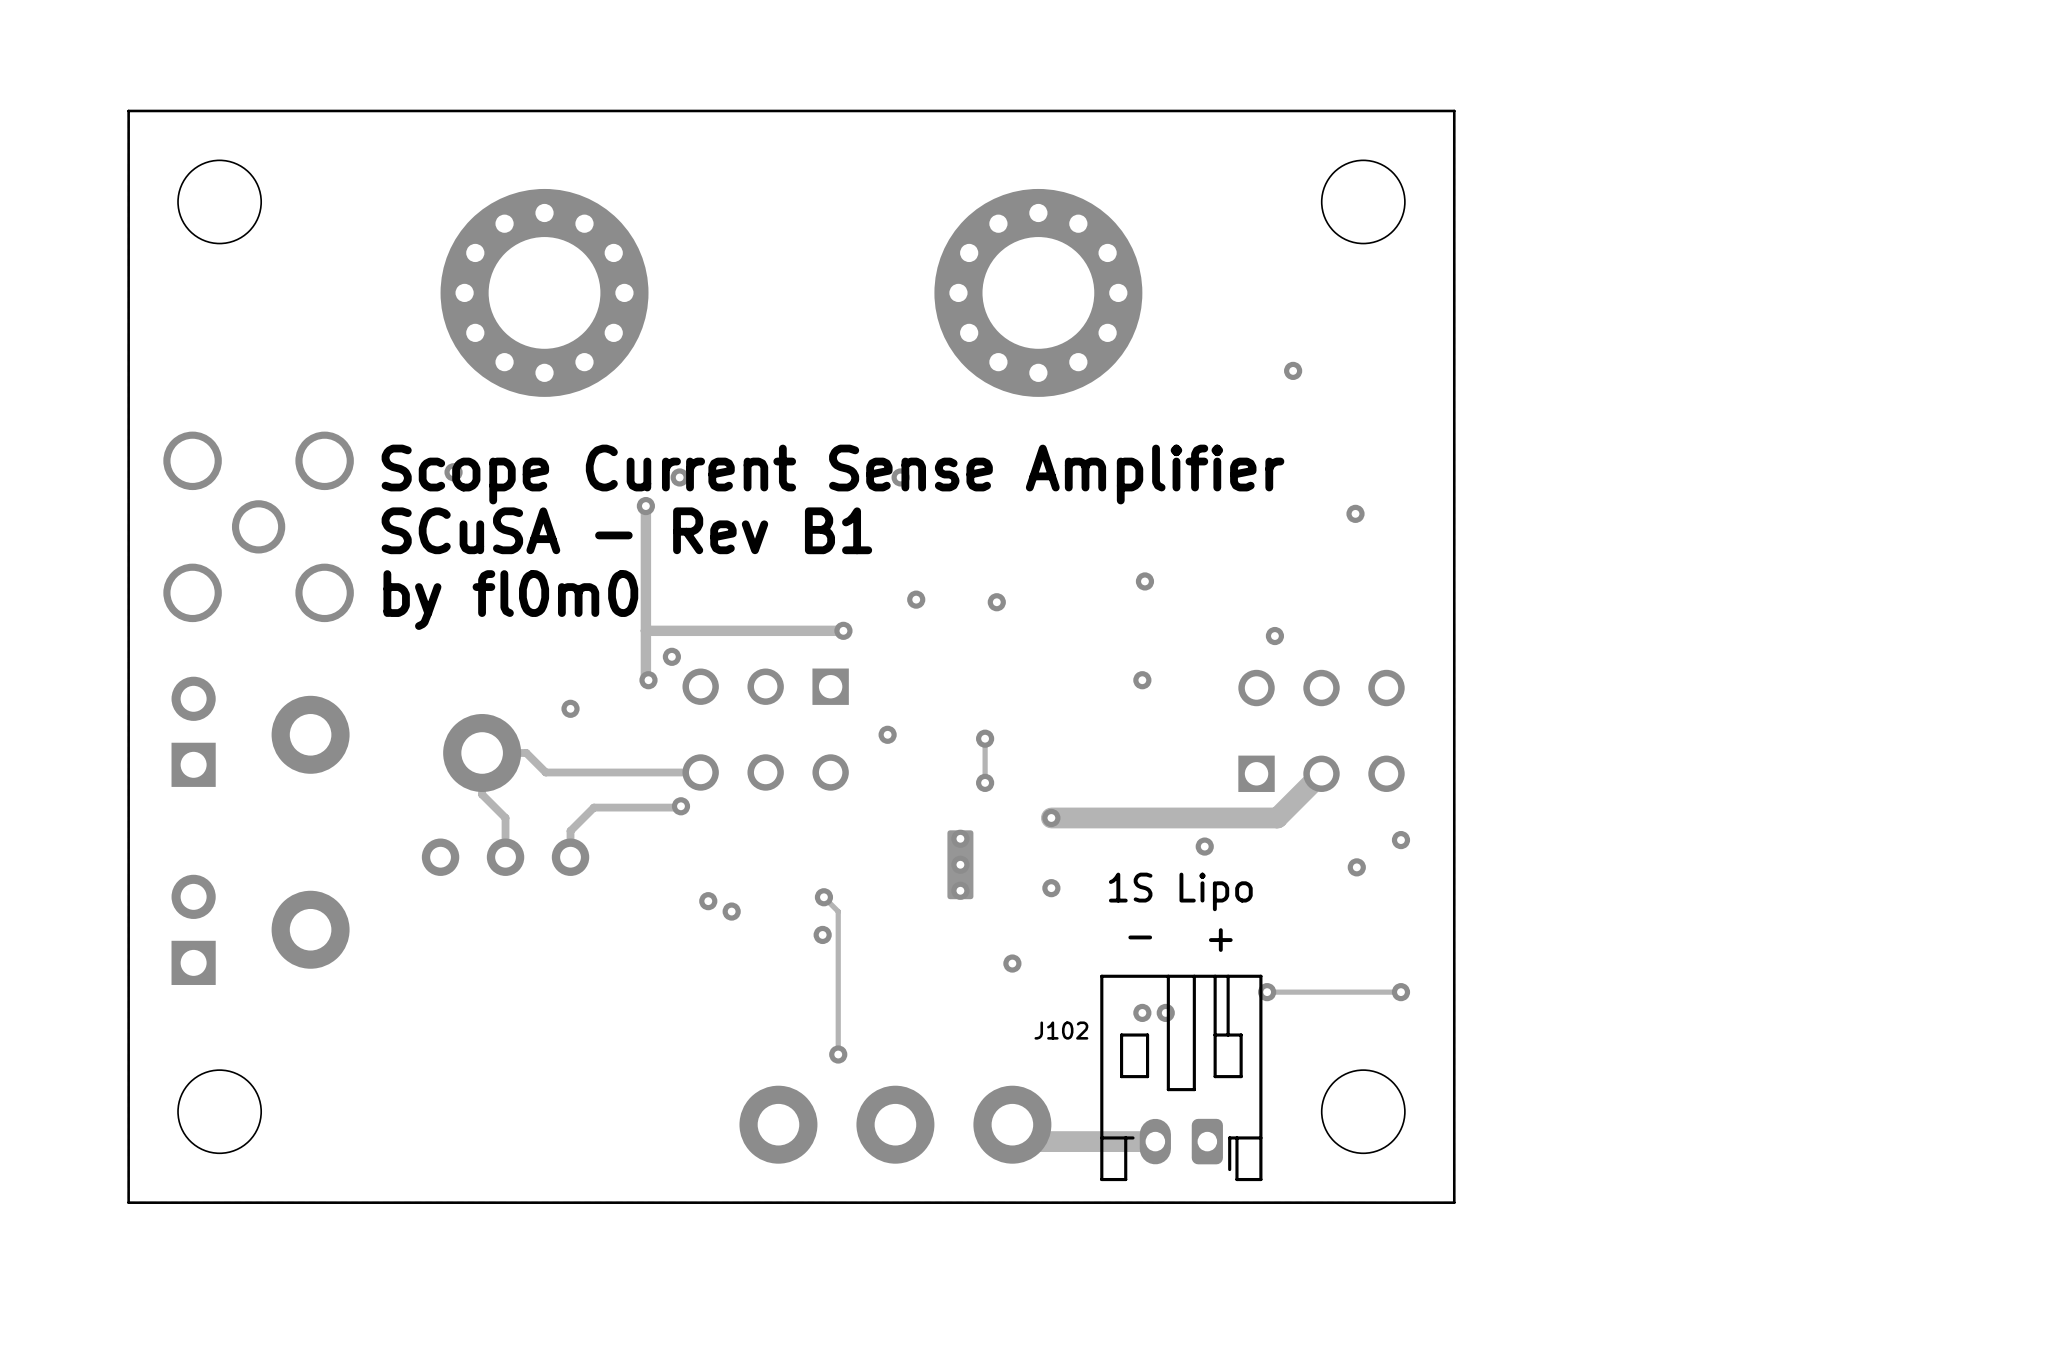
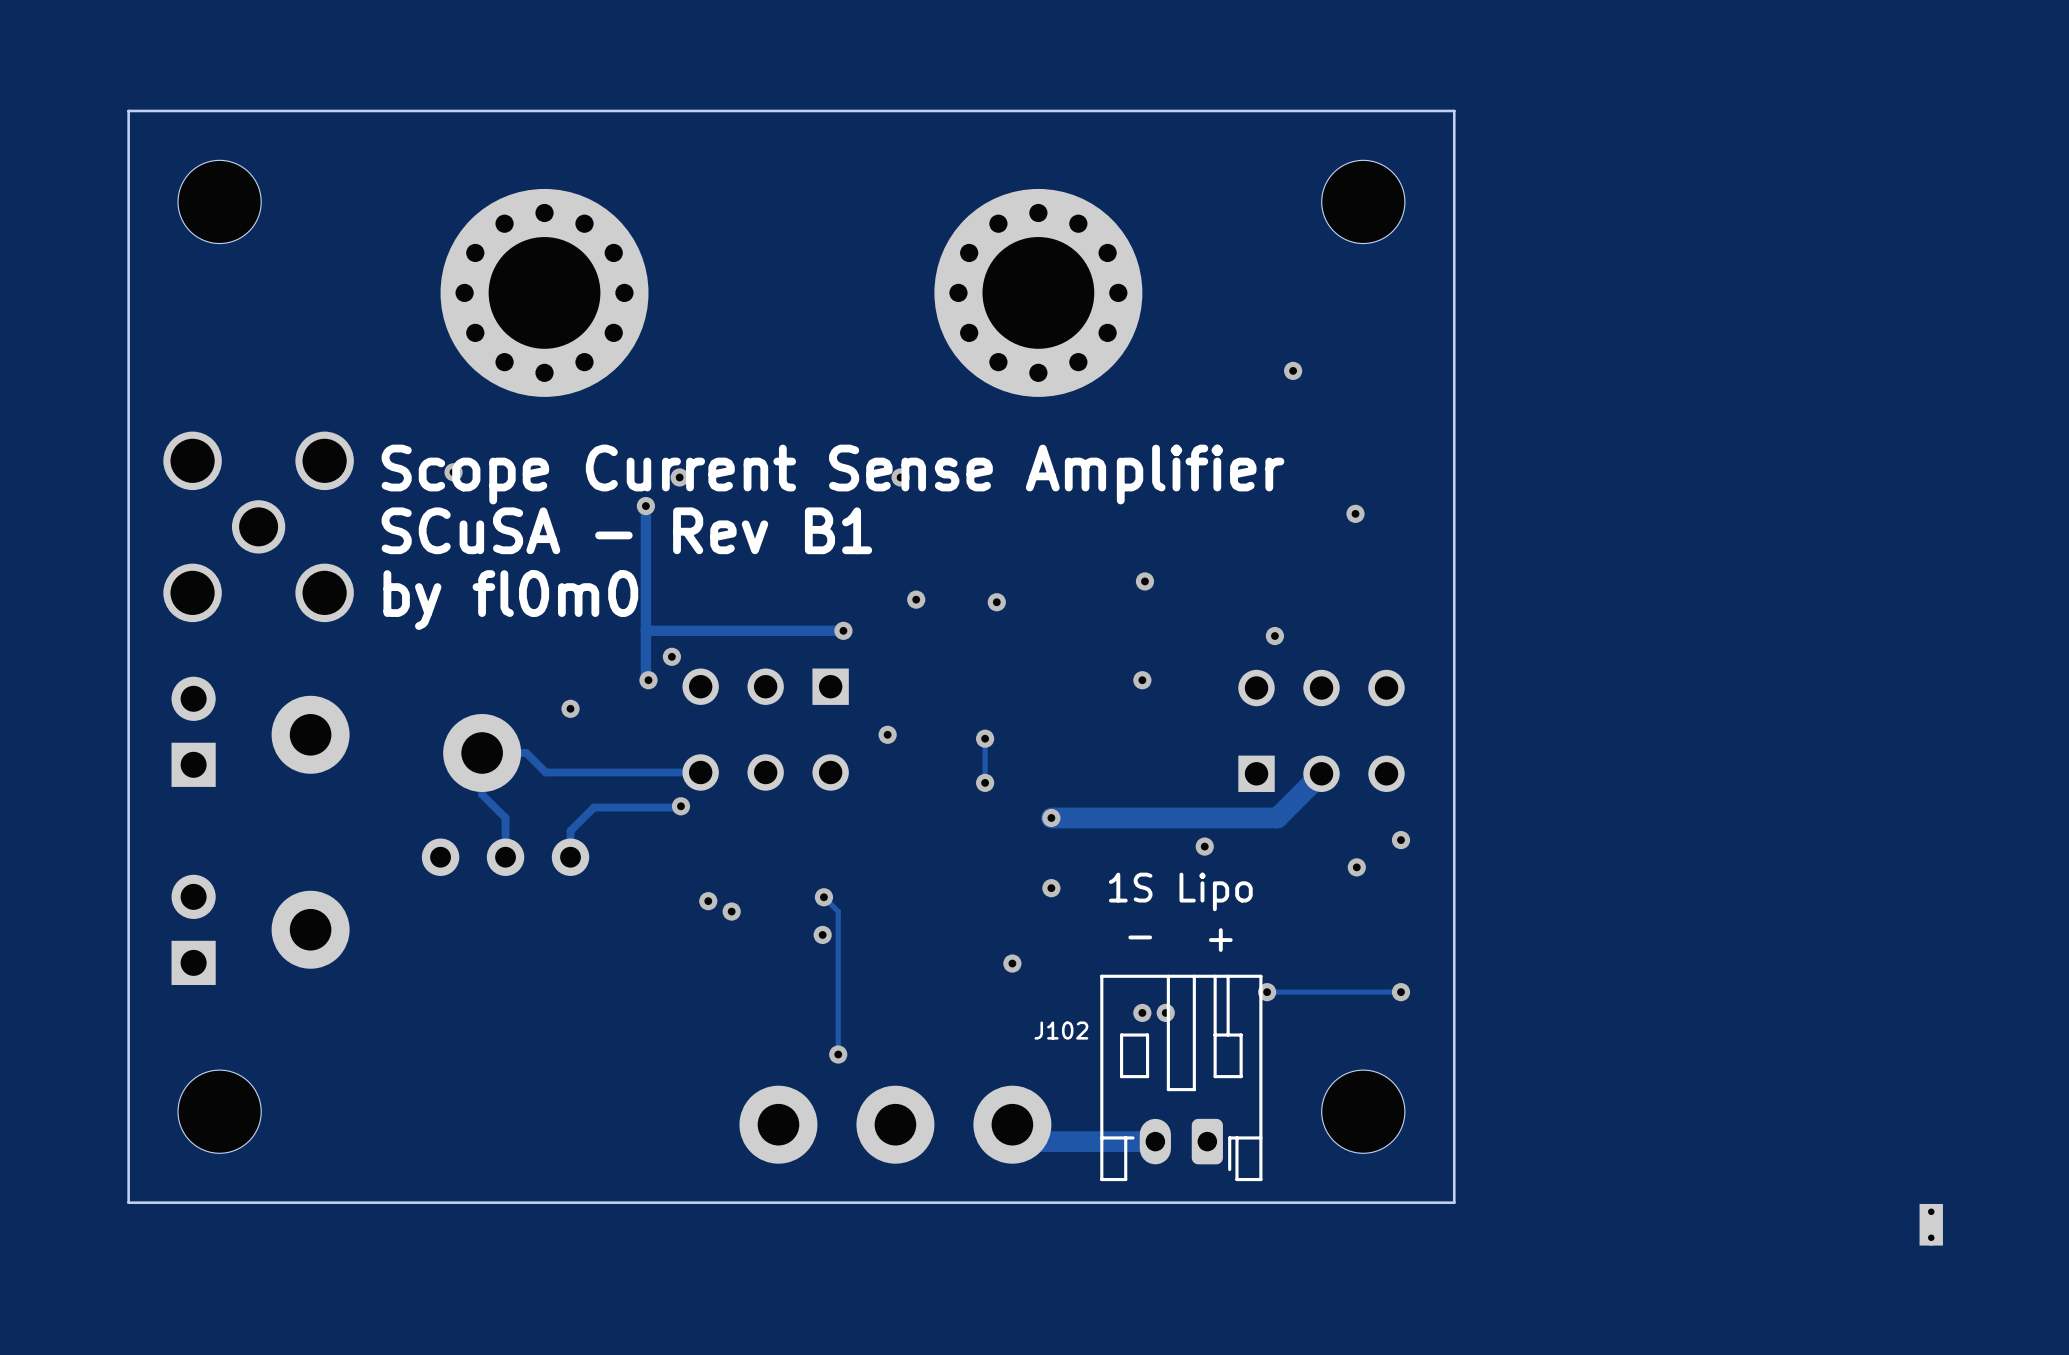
part: (960, 864) -> none
part: none -> (1931, 1224)

